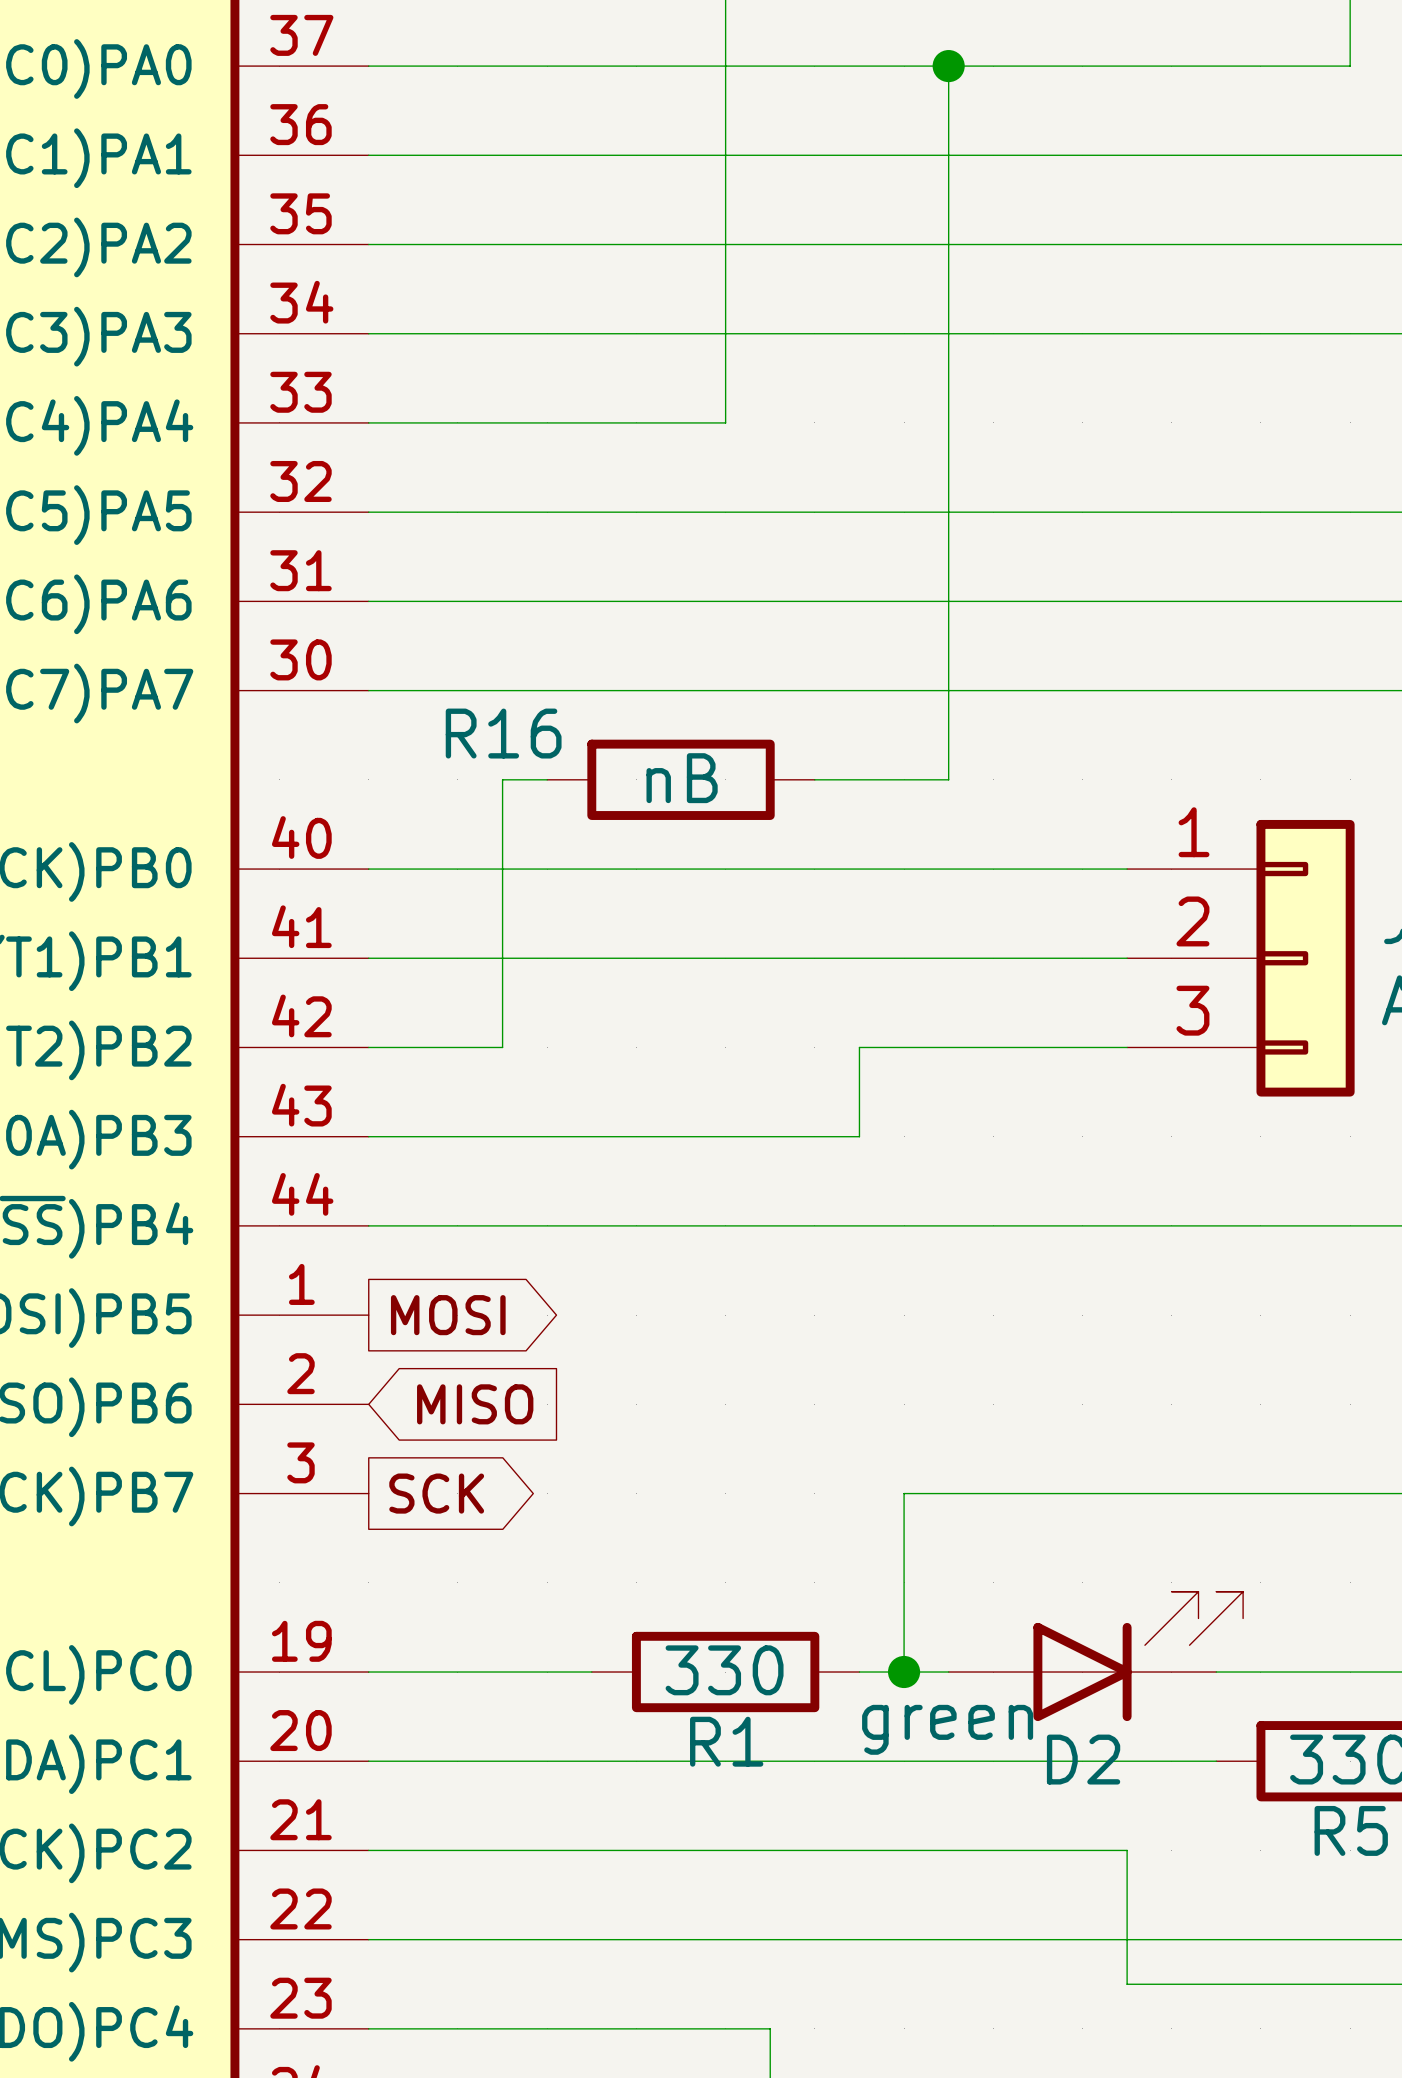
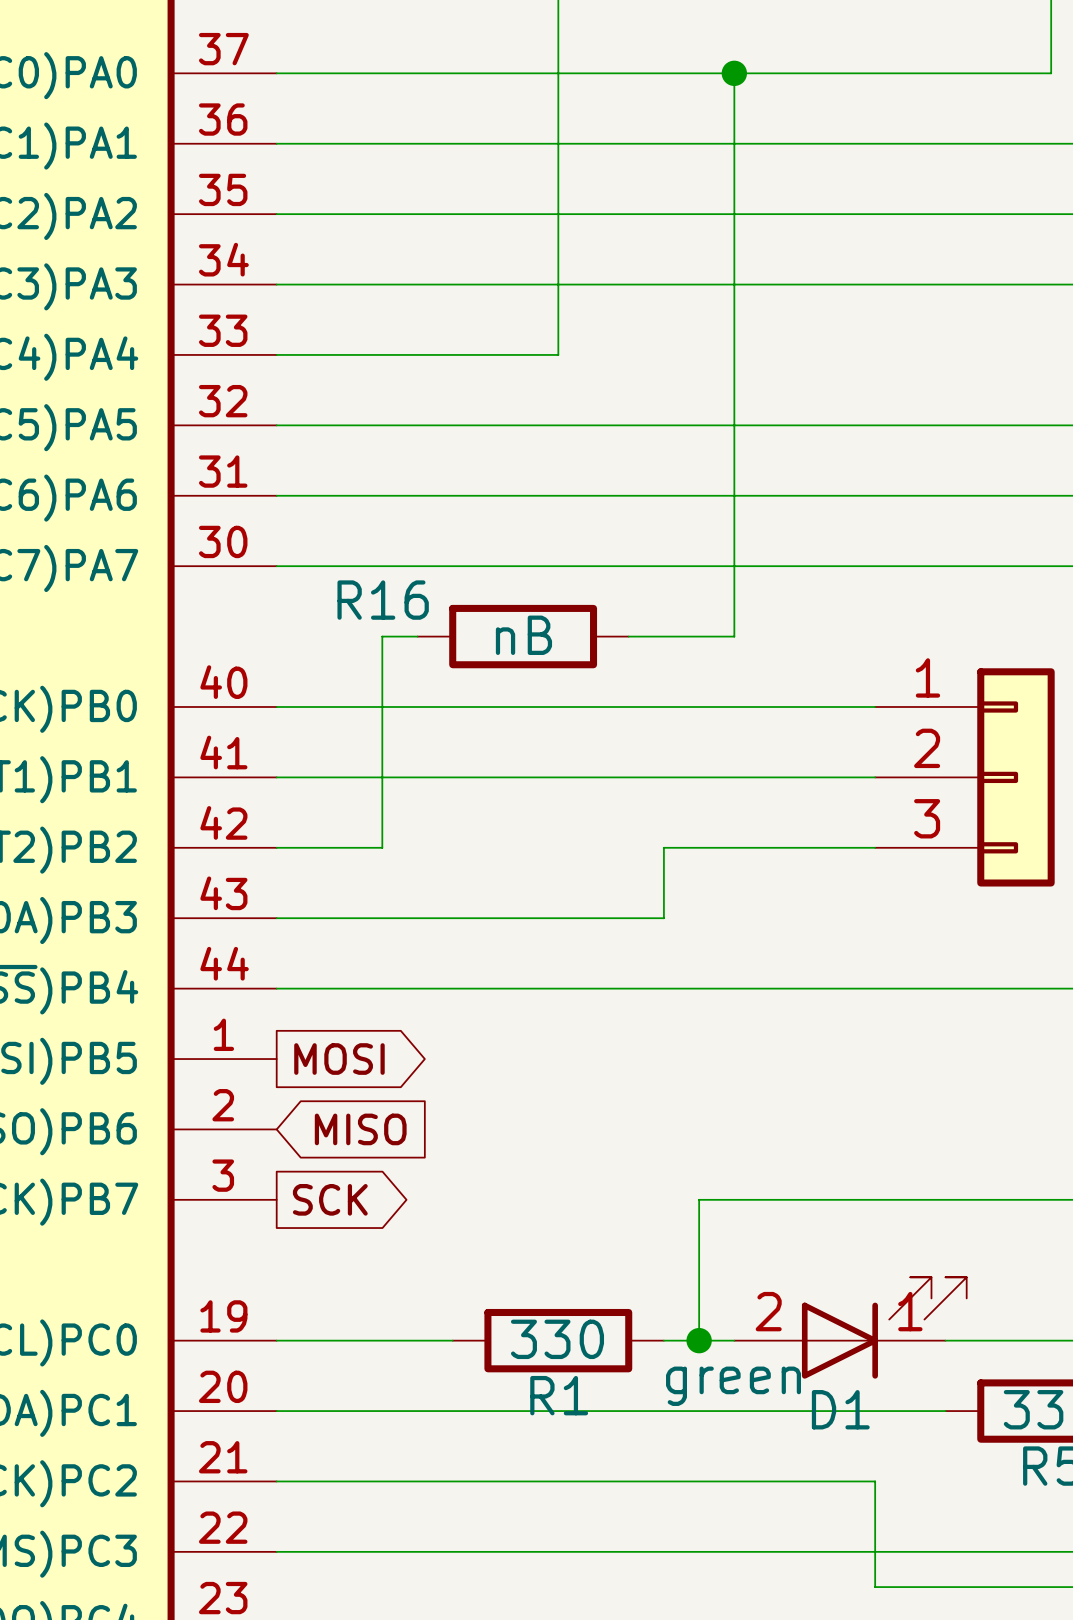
D1: none -> green (850, 1327)
D2: green (1095, 1656) -> none

